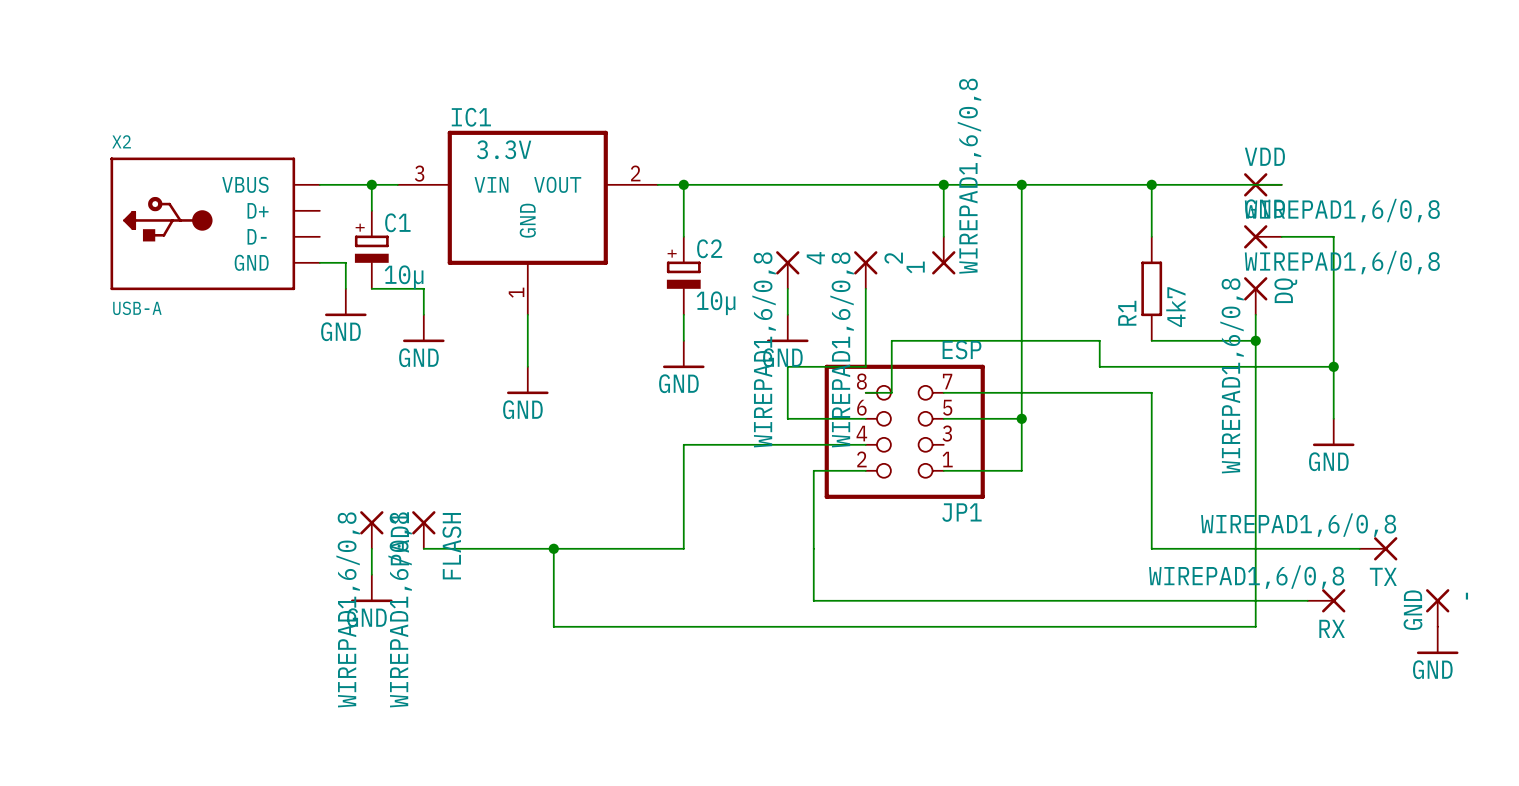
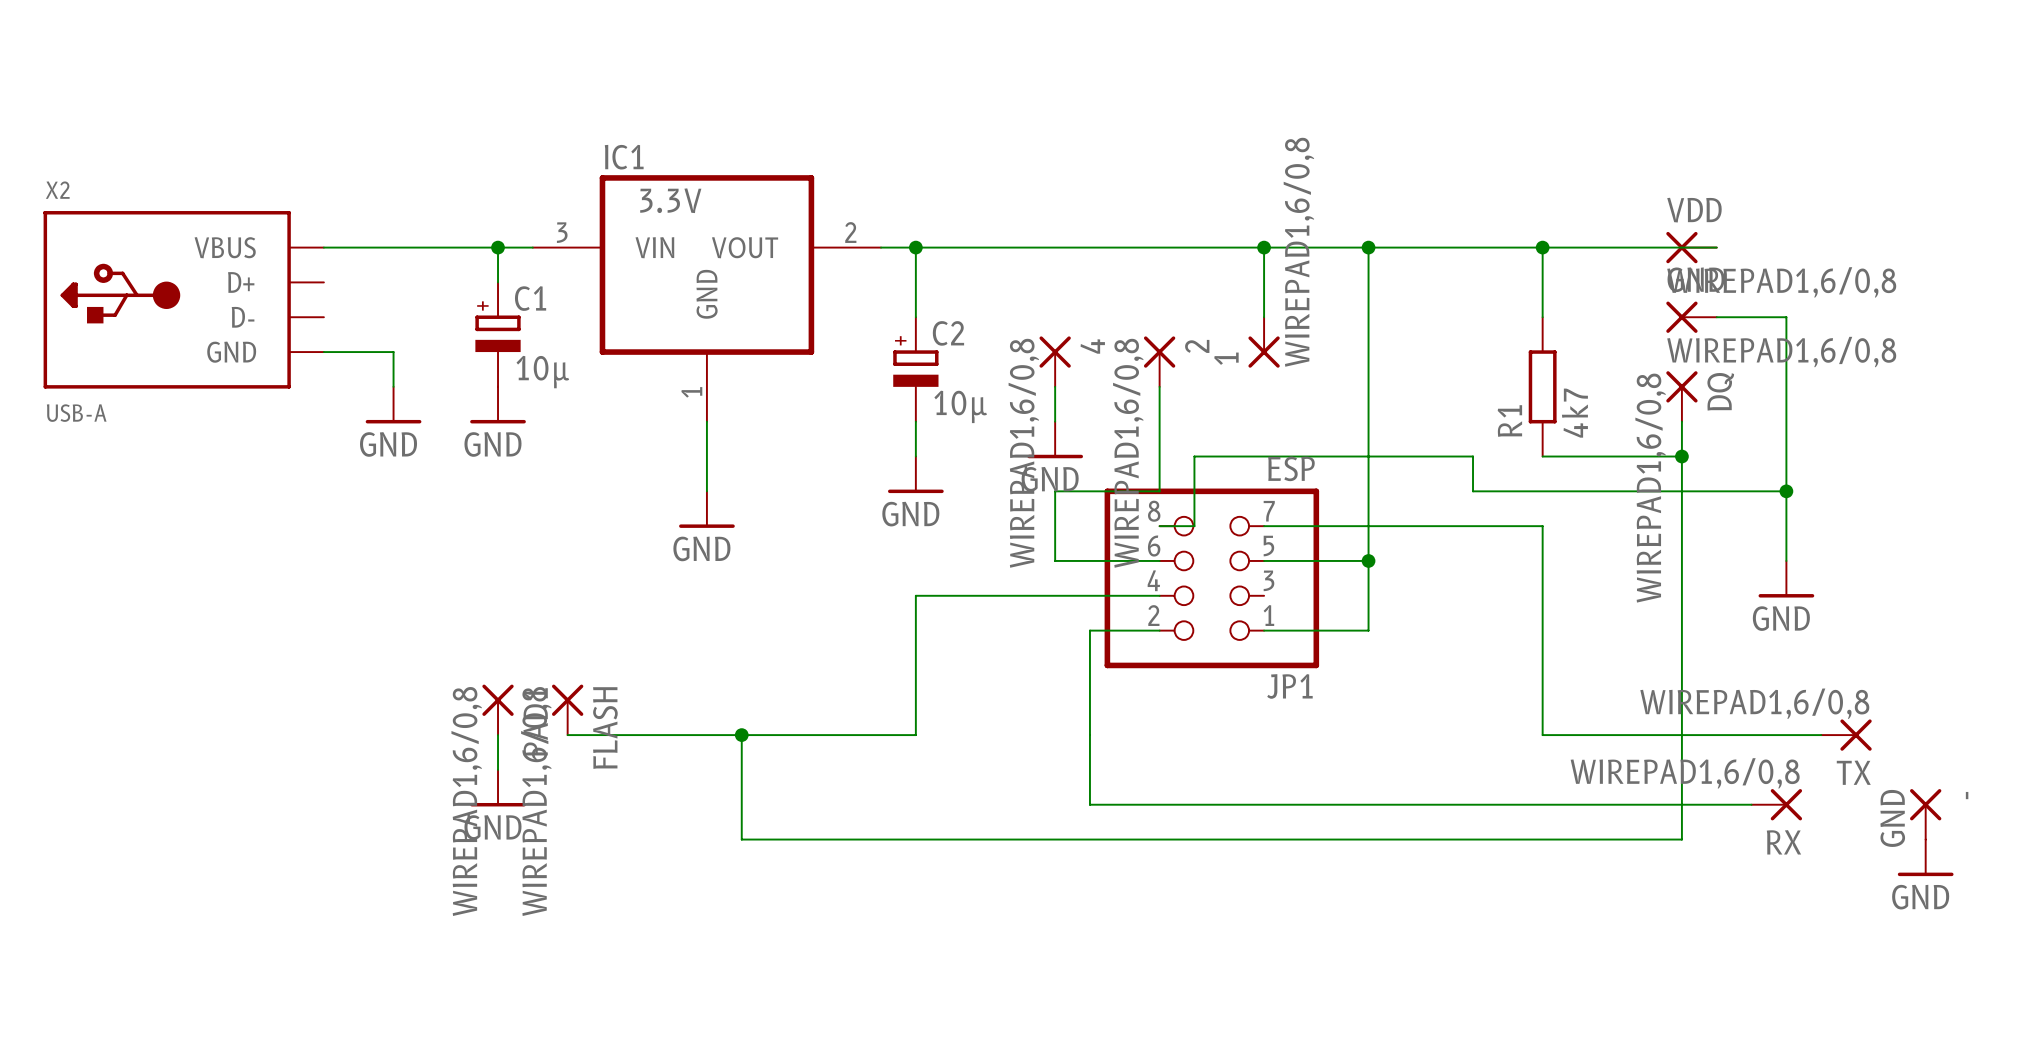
wire: none -> (323, 247) (428, 247)
X2 position: (214, 223) -> (183, 299)
wire: (319, 262) (345, 262) (345, 288) -> none
wire: (371, 288) (423, 288) (423, 314) -> (323, 352) (393, 352) (393, 386)
power symbol: none -> GND (393, 405)
power symbol: GND (345, 302) -> none
power symbol: none -> GND (498, 405)
power symbol: GND (423, 328) -> none

